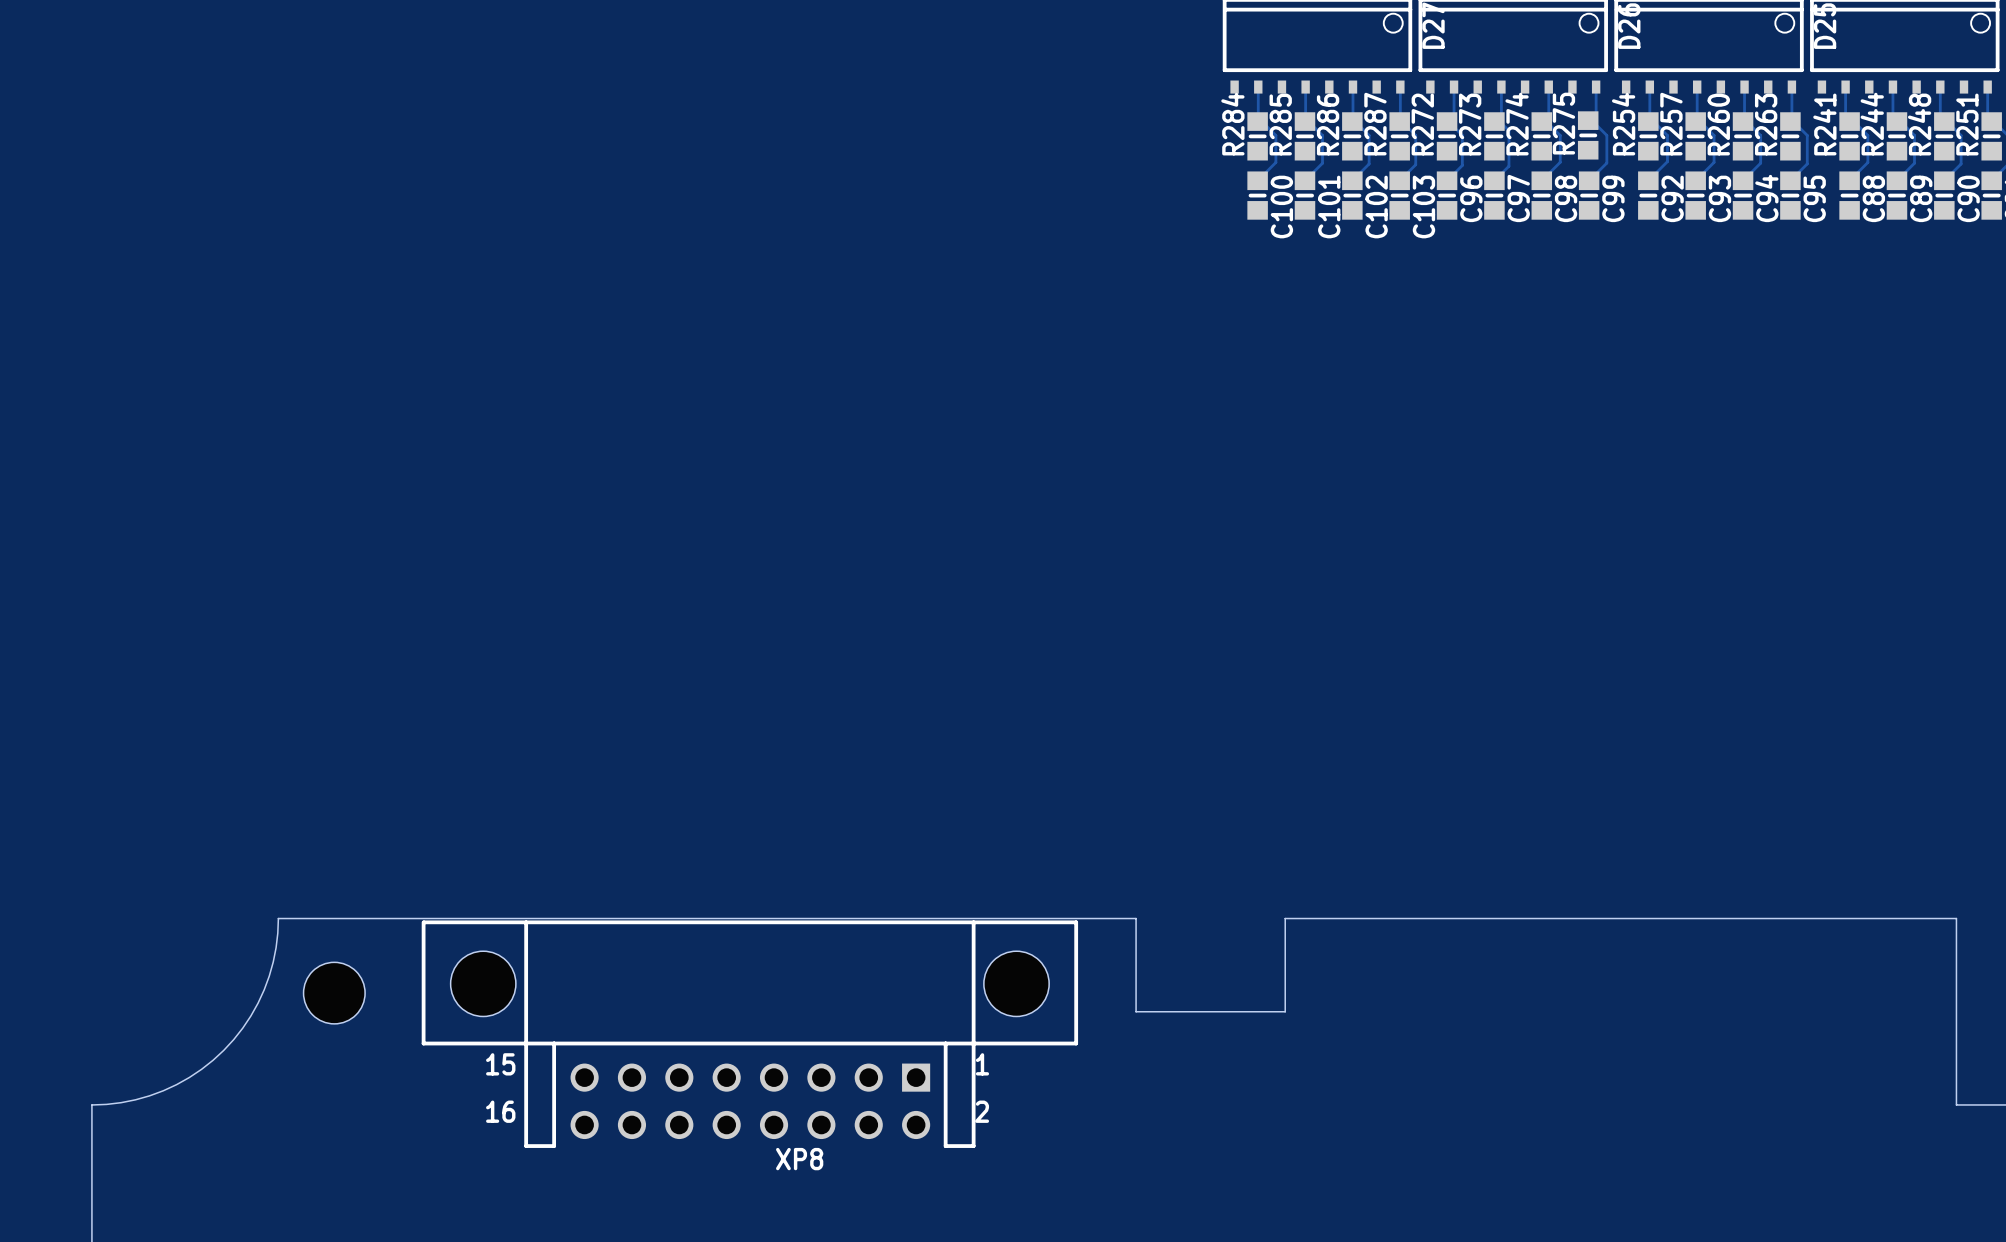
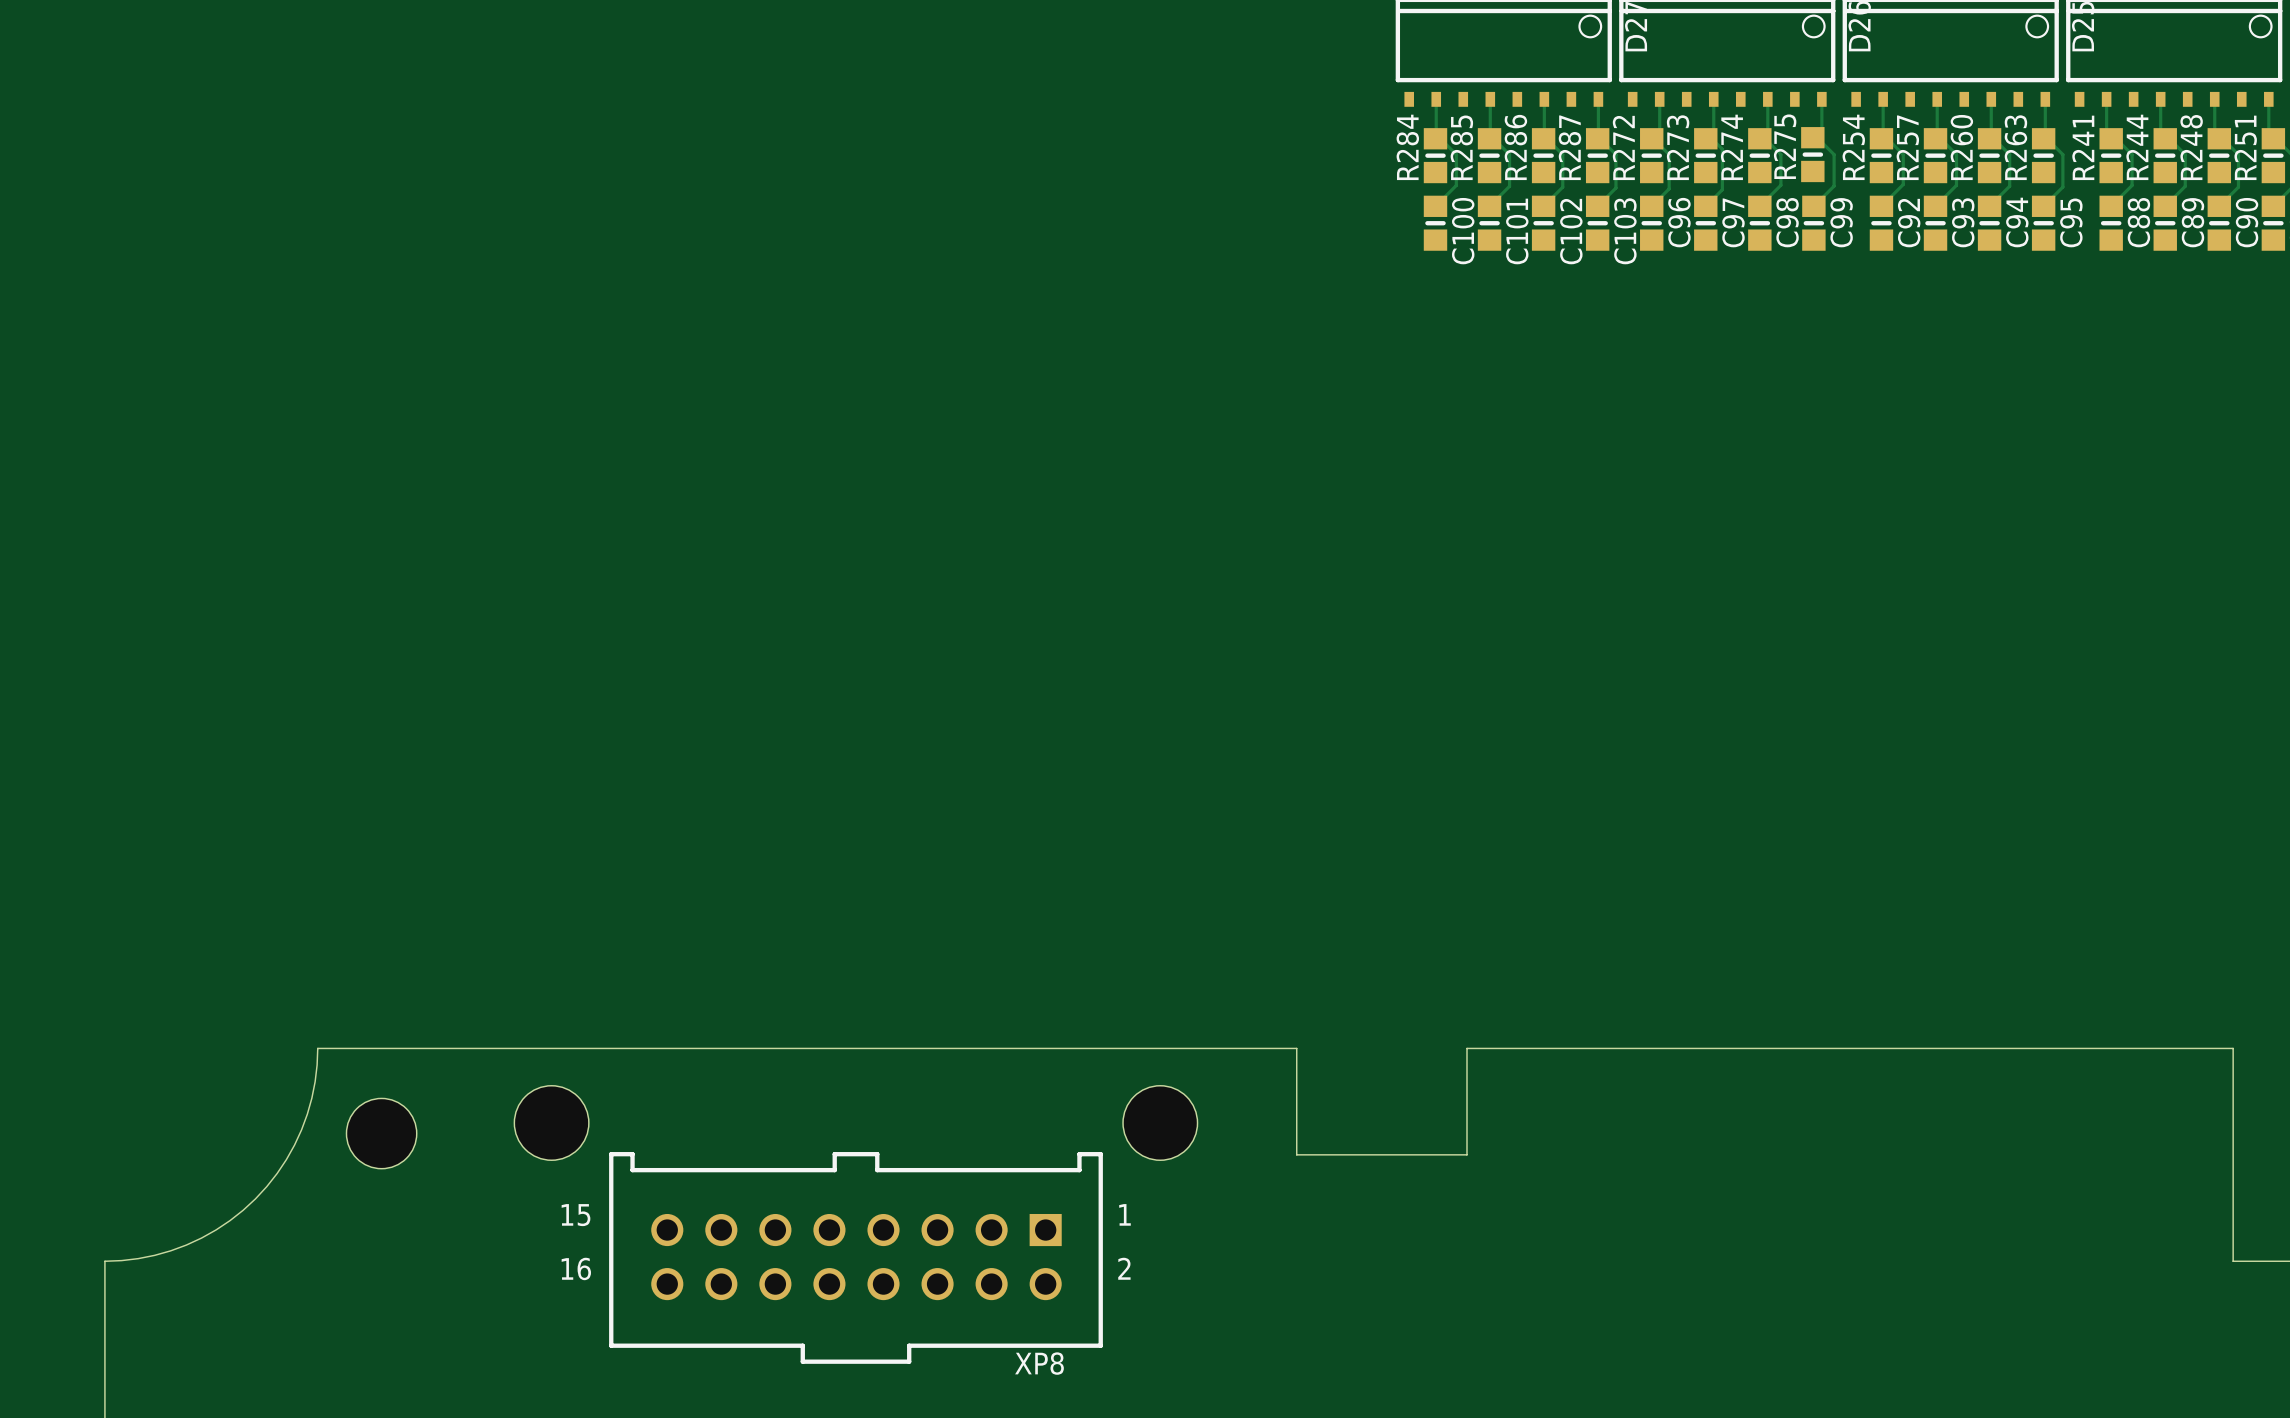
XP8 footprint: [421, 920, 1079, 1148] -> [514, 1085, 1198, 1364]
XP8 name position: XP8 (799, 1159) -> XP8 (1039, 1363)

